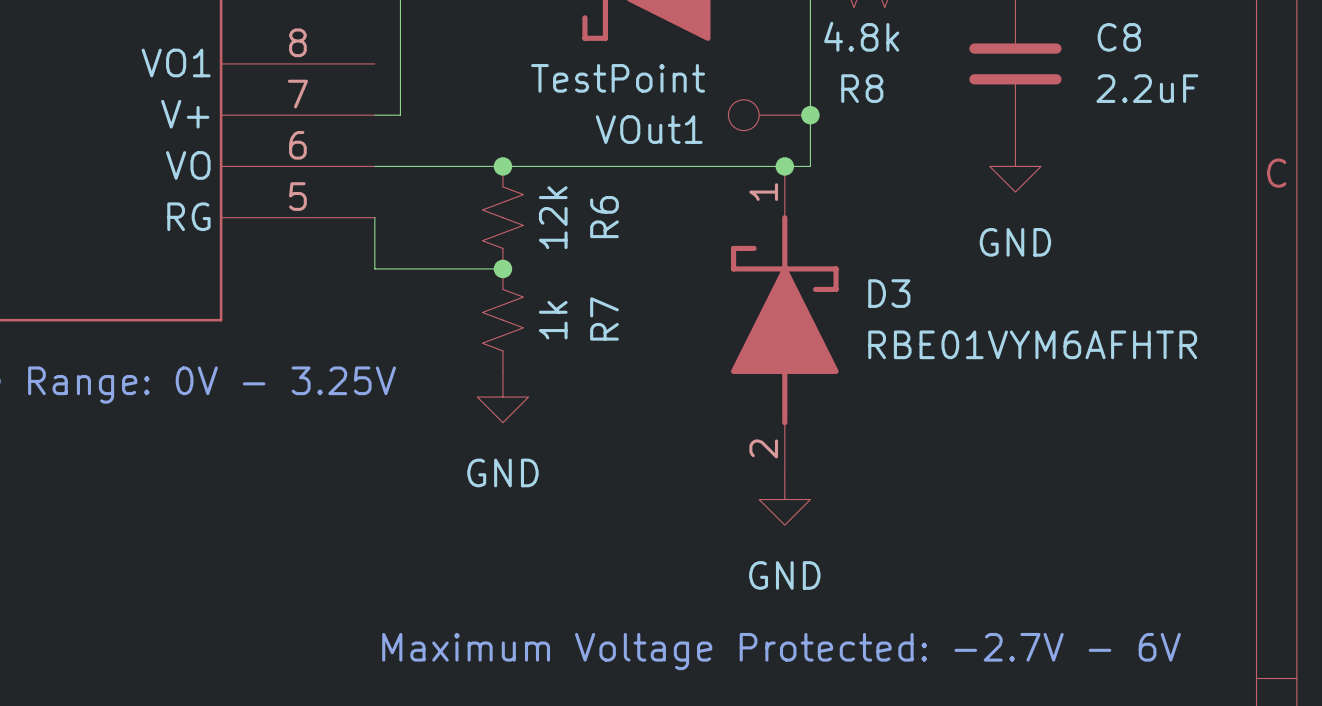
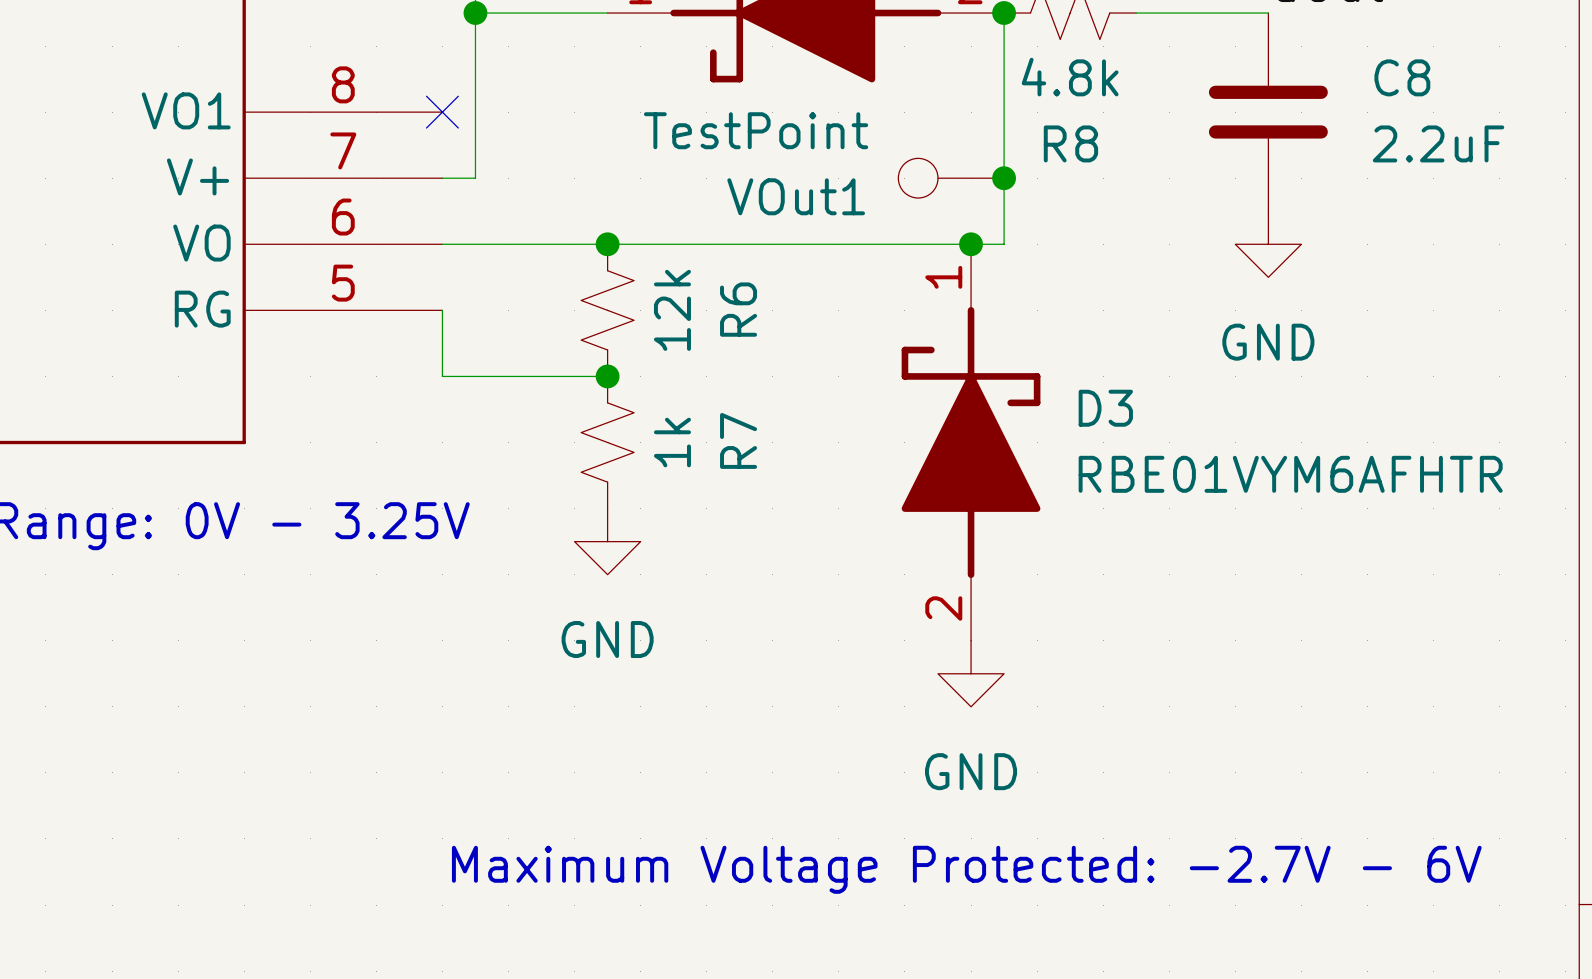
no-connect mark: none -> (442, 112)

